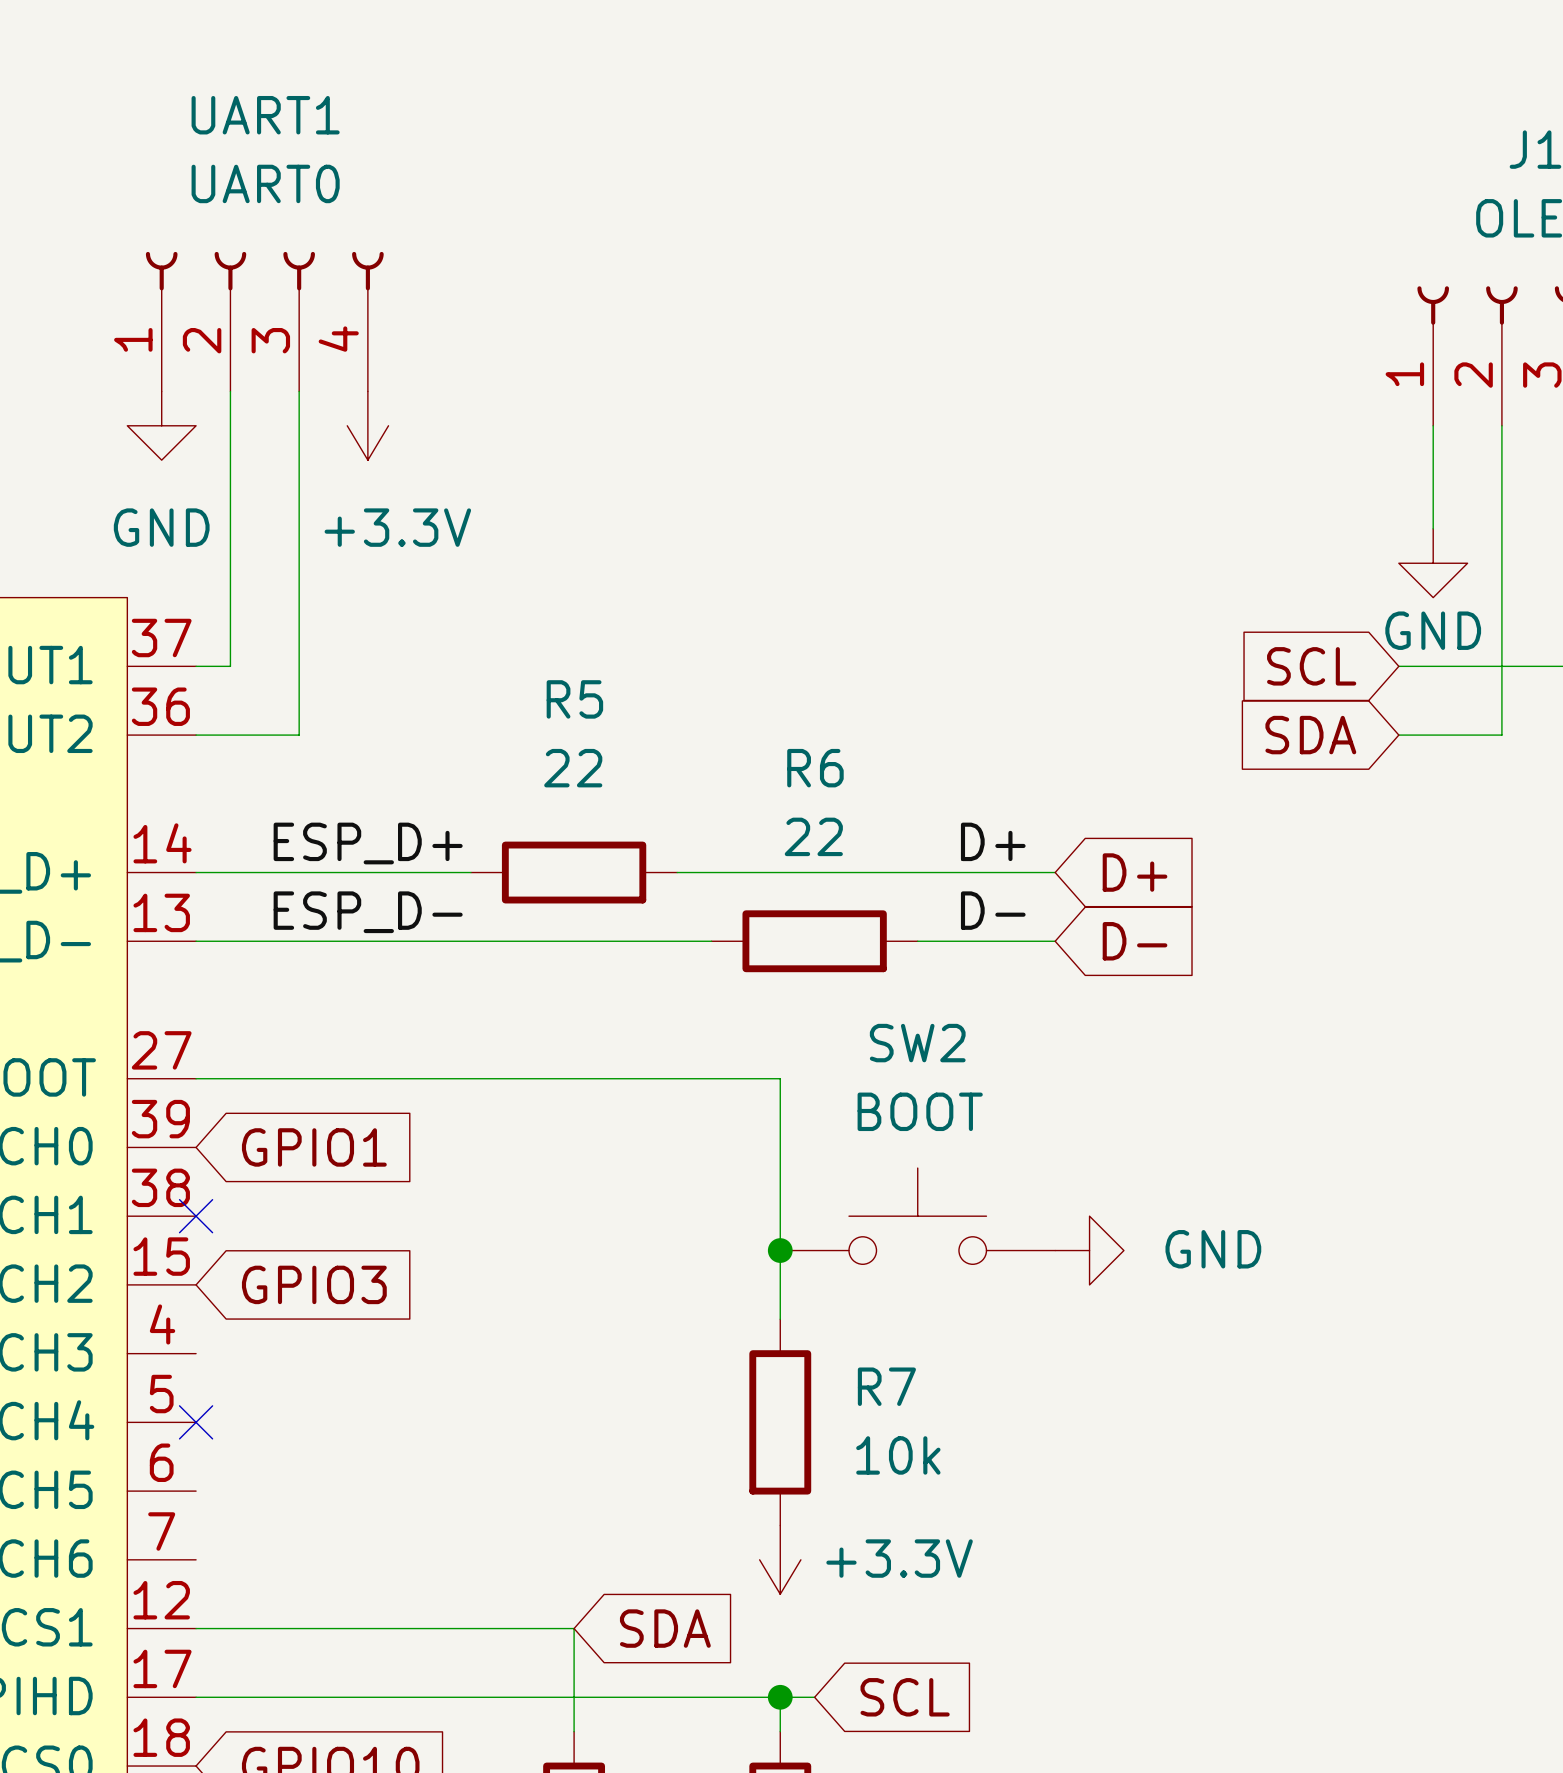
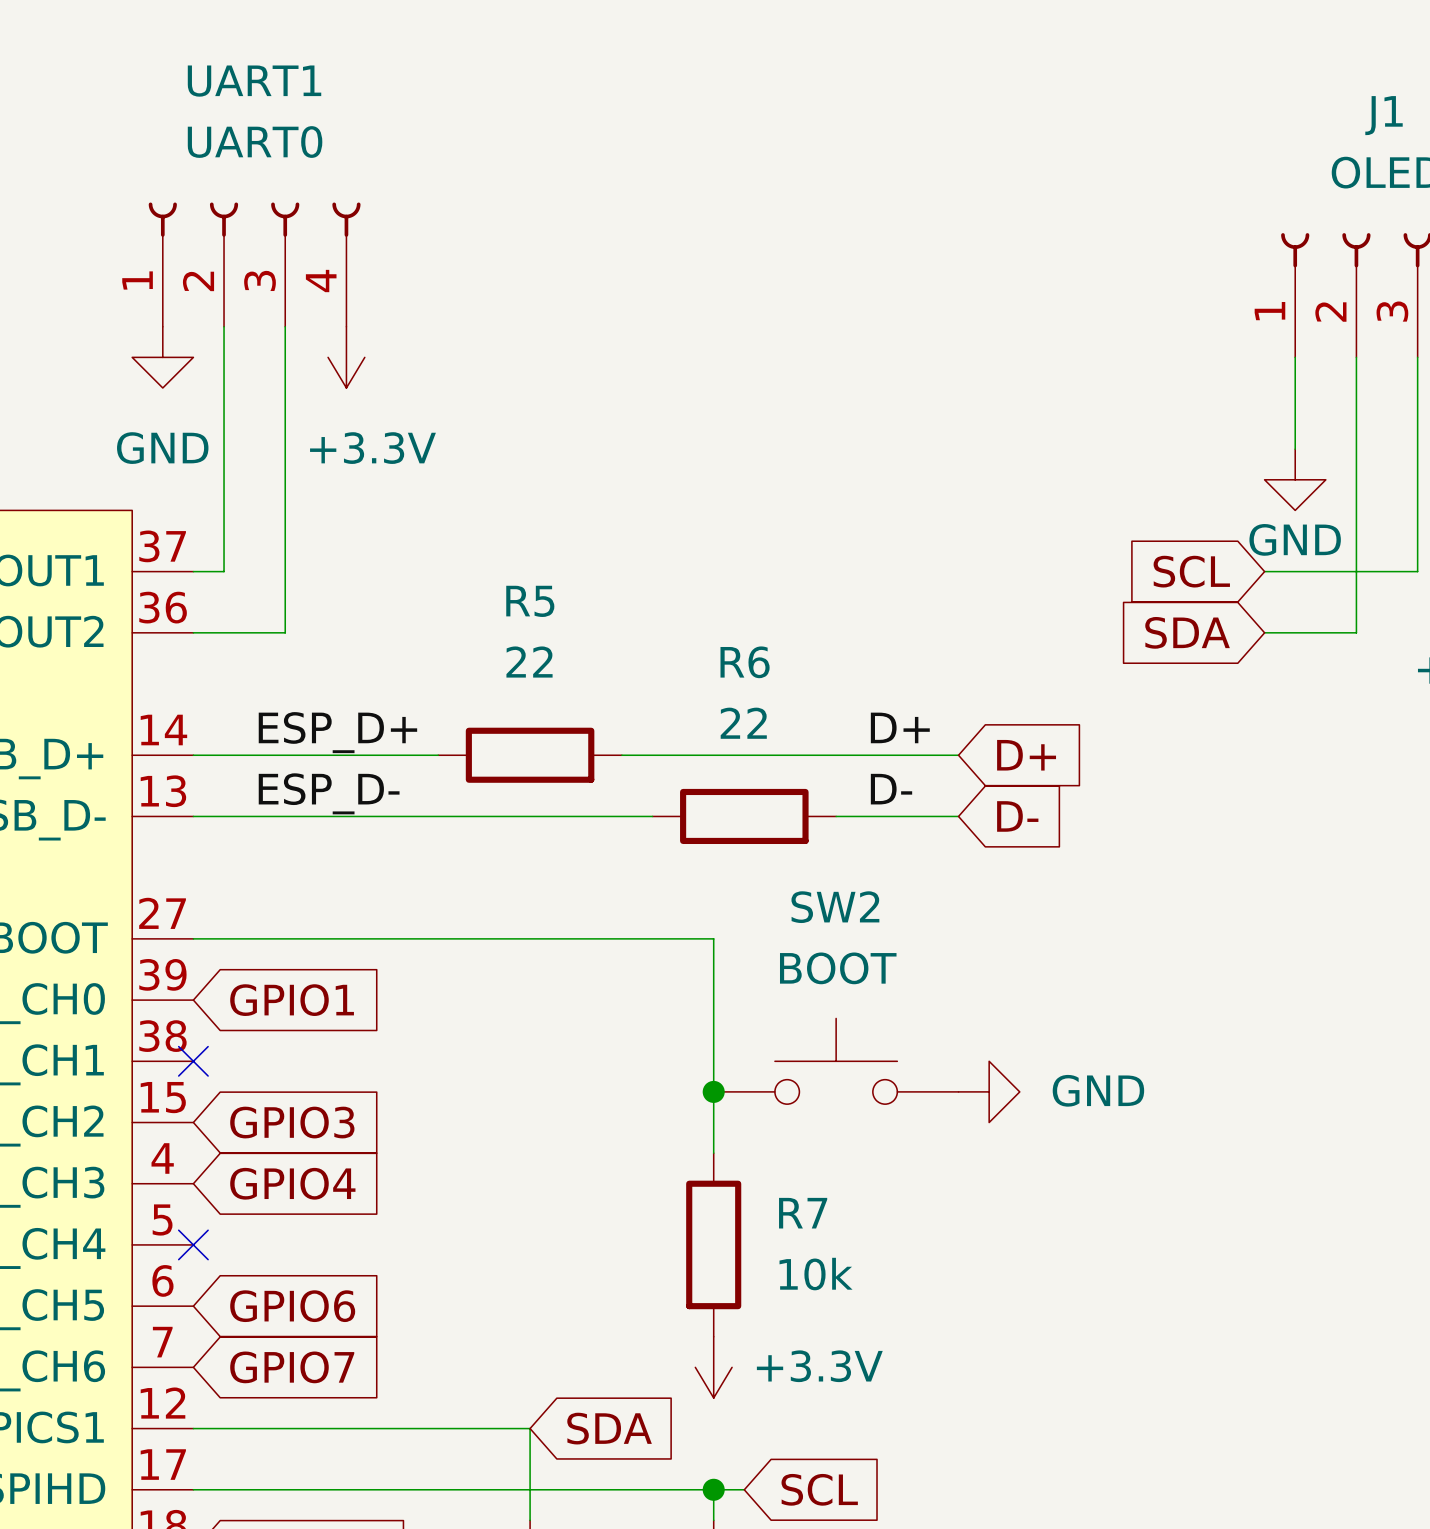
global label: none -> GPIO4 (292, 1183)
global label: none -> GPIO6 (292, 1306)
global label: none -> GPIO7 (292, 1367)

